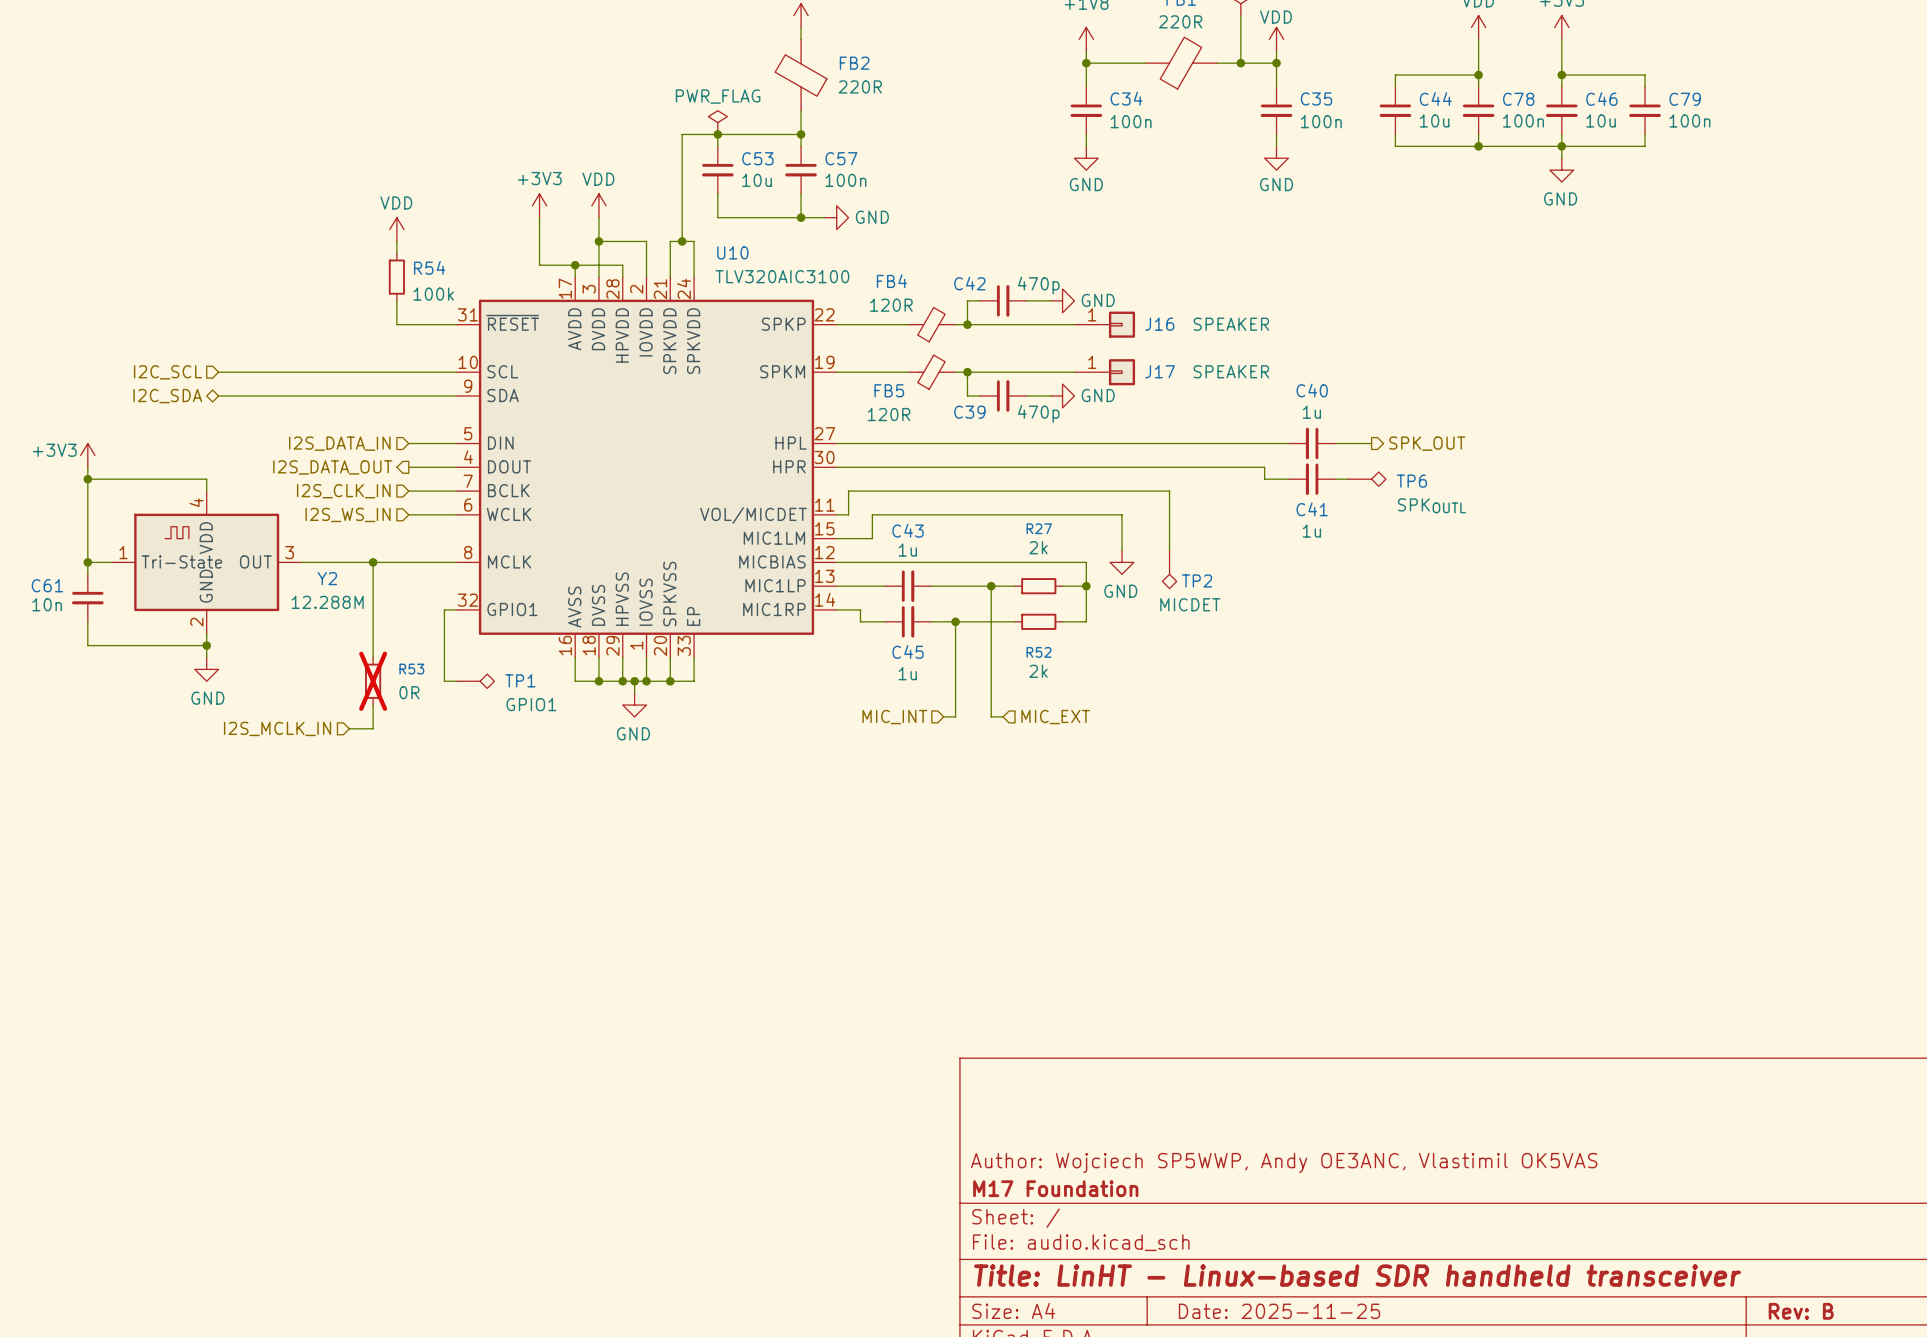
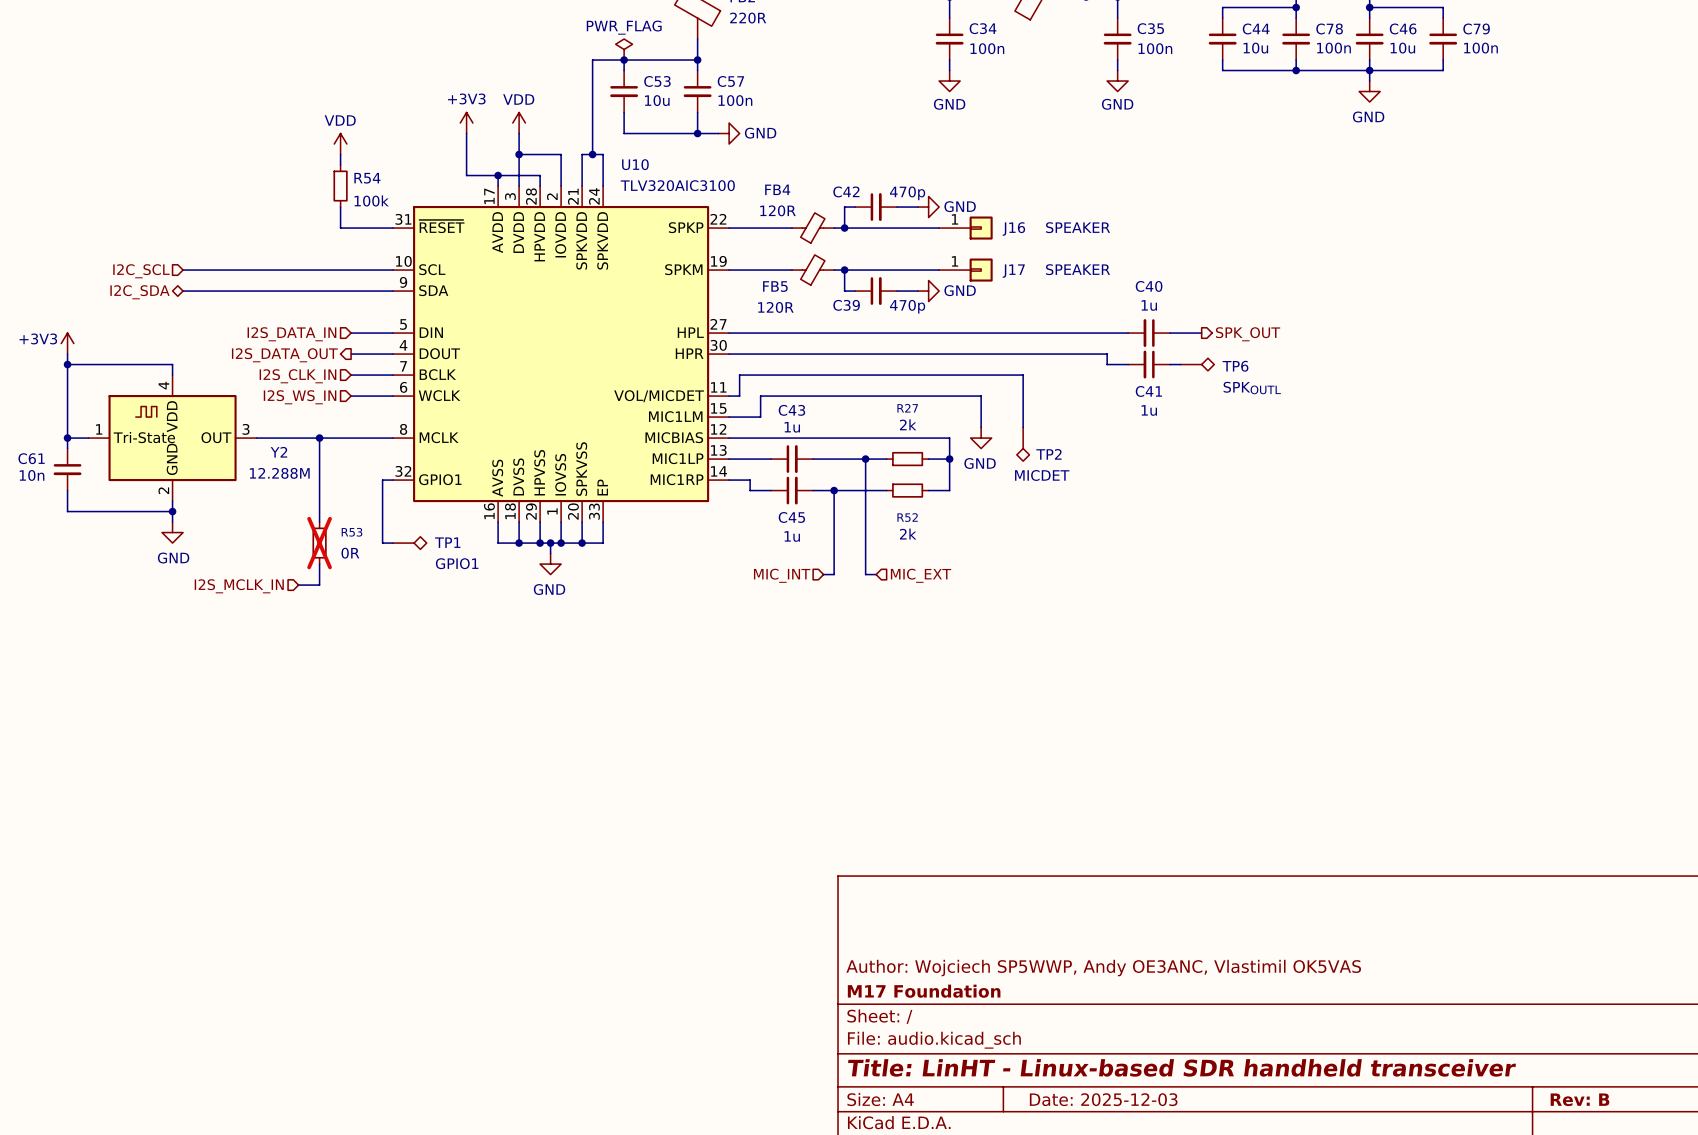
title block: Date: 2025-11-25 (1279, 1311) -> Date: 2025-12-03 (1103, 1099)

